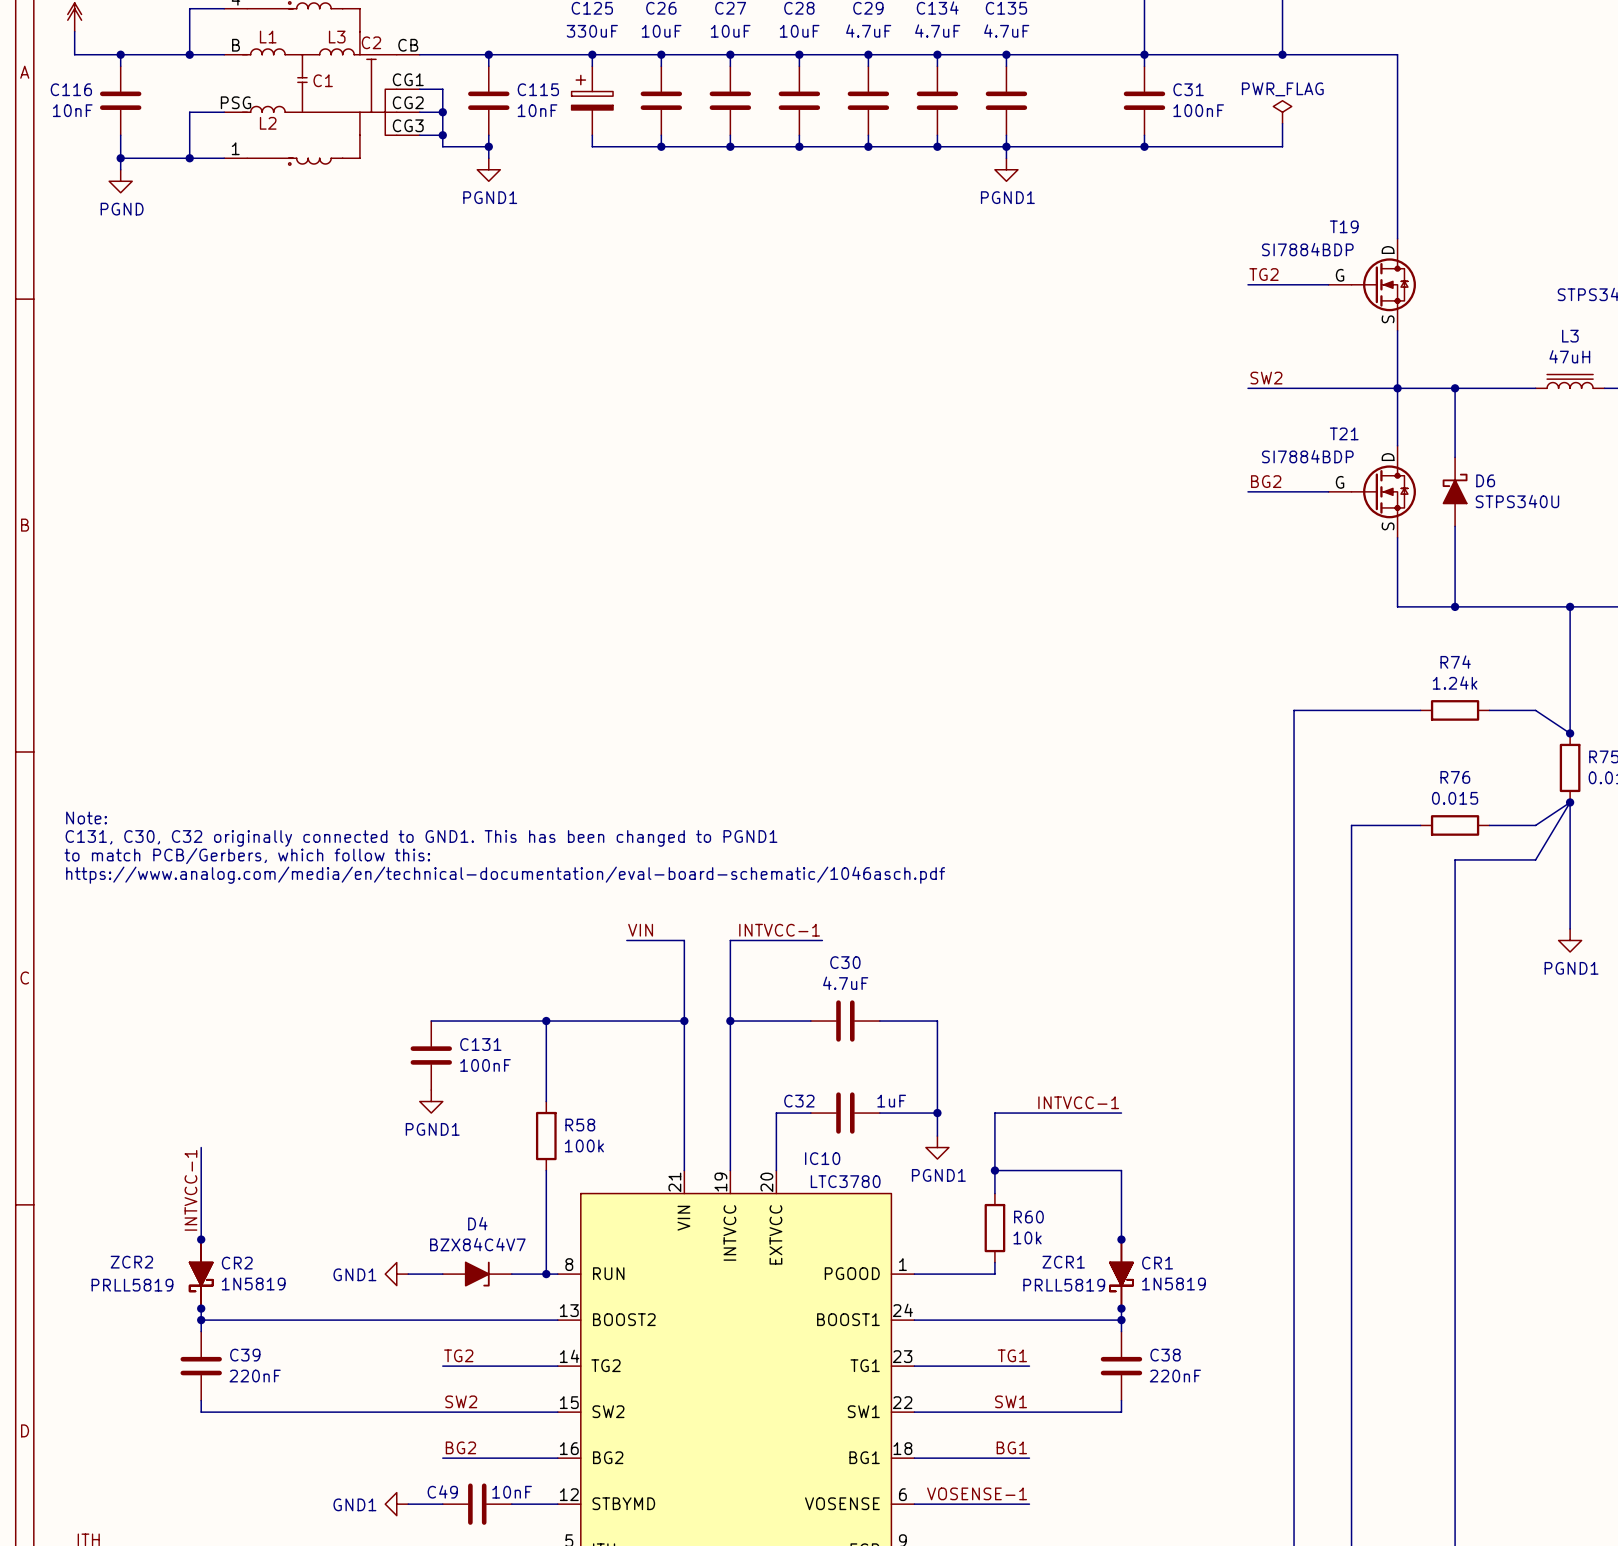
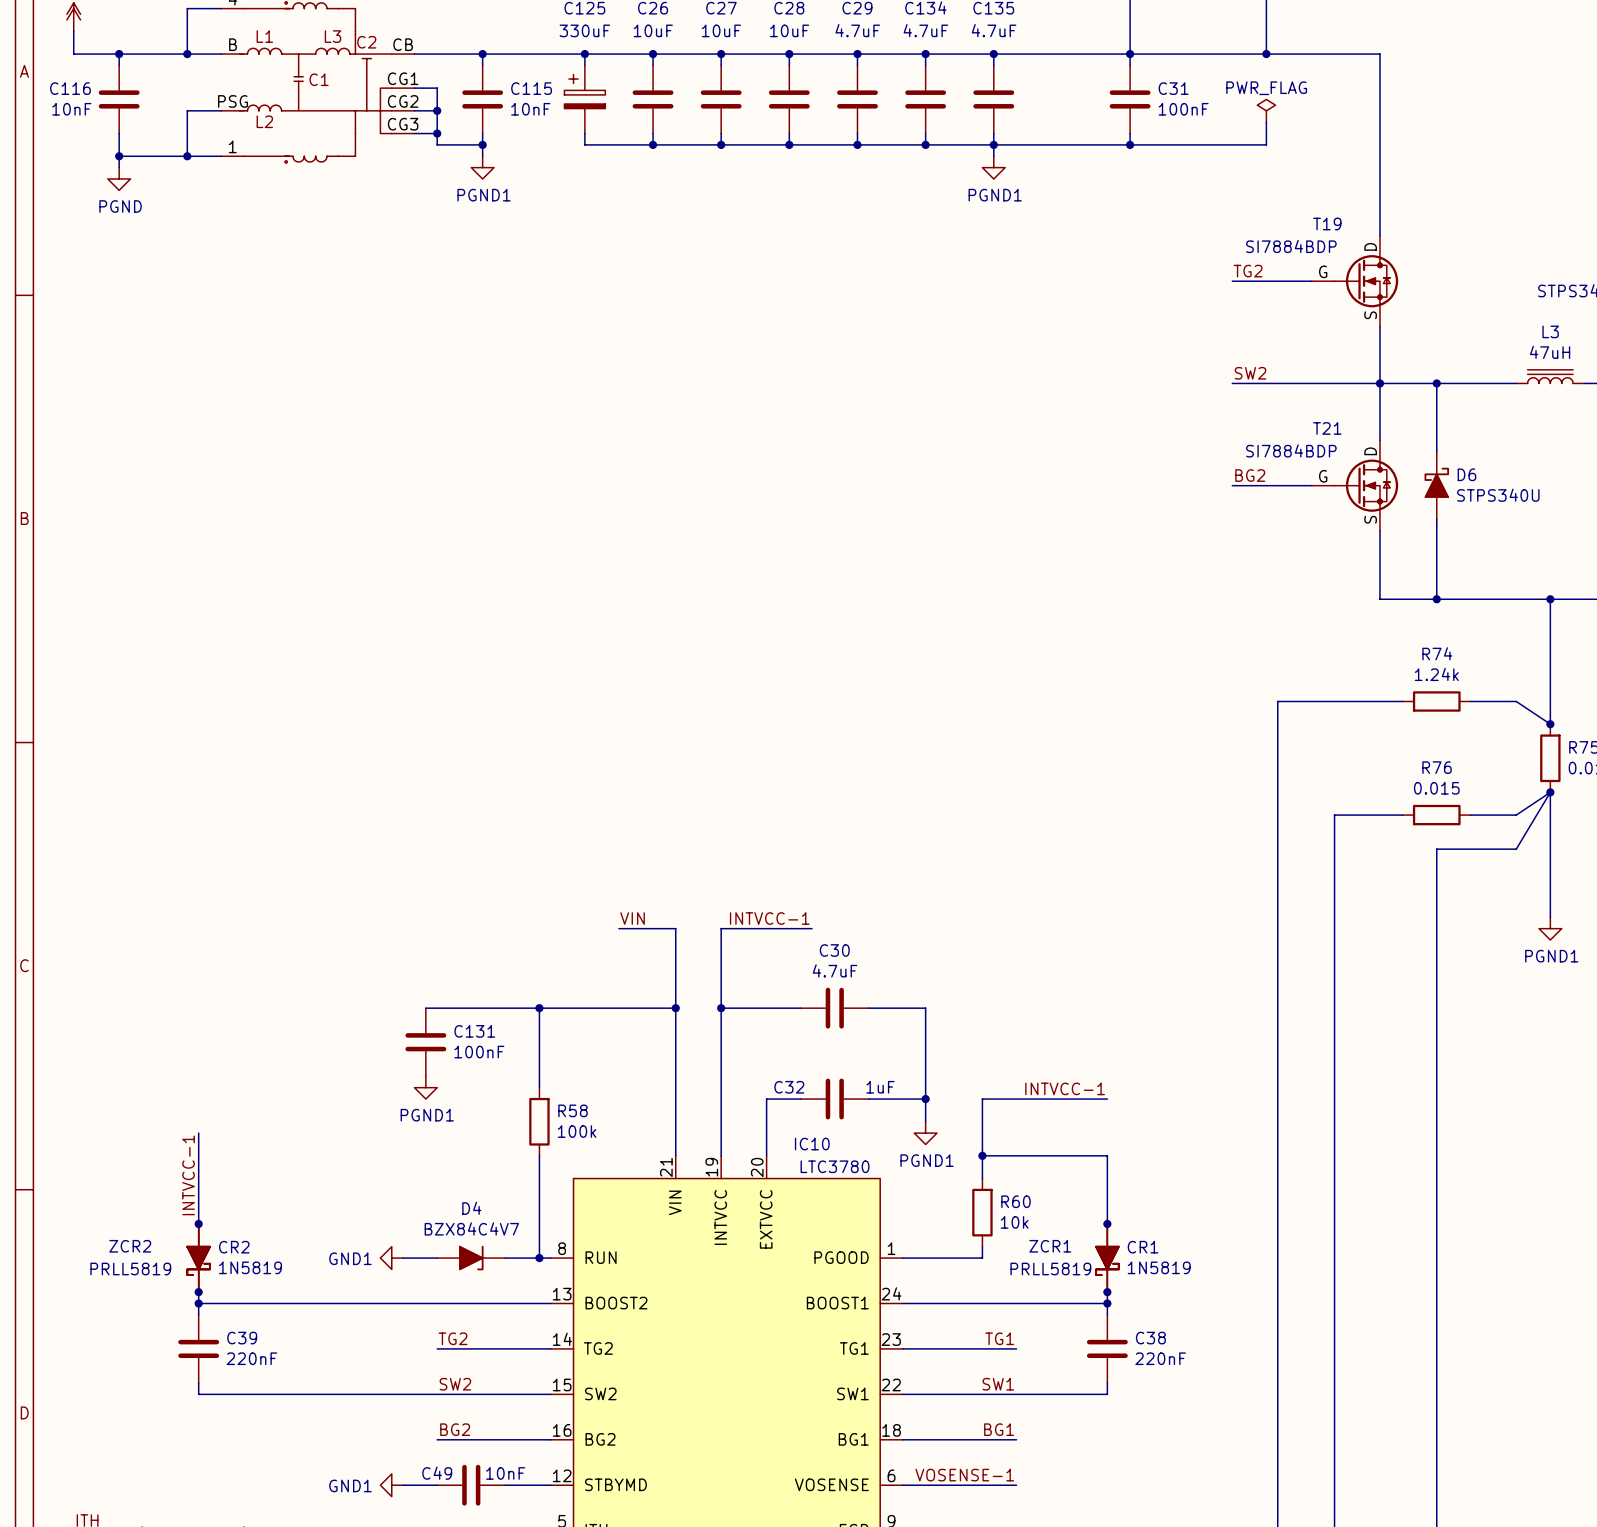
text: Note: (86, 817) -> none
text: C131, C30, C32 originally connected to GND1. This has been changed to PGND1 (421, 838) -> none
text: to match PCB/Gerbers, which follow this: (247, 856) -> none
text: https://www.analog.com/media/en/technical-documentation/eval-board-schematic/1046asch.pdf (505, 875) -> none

